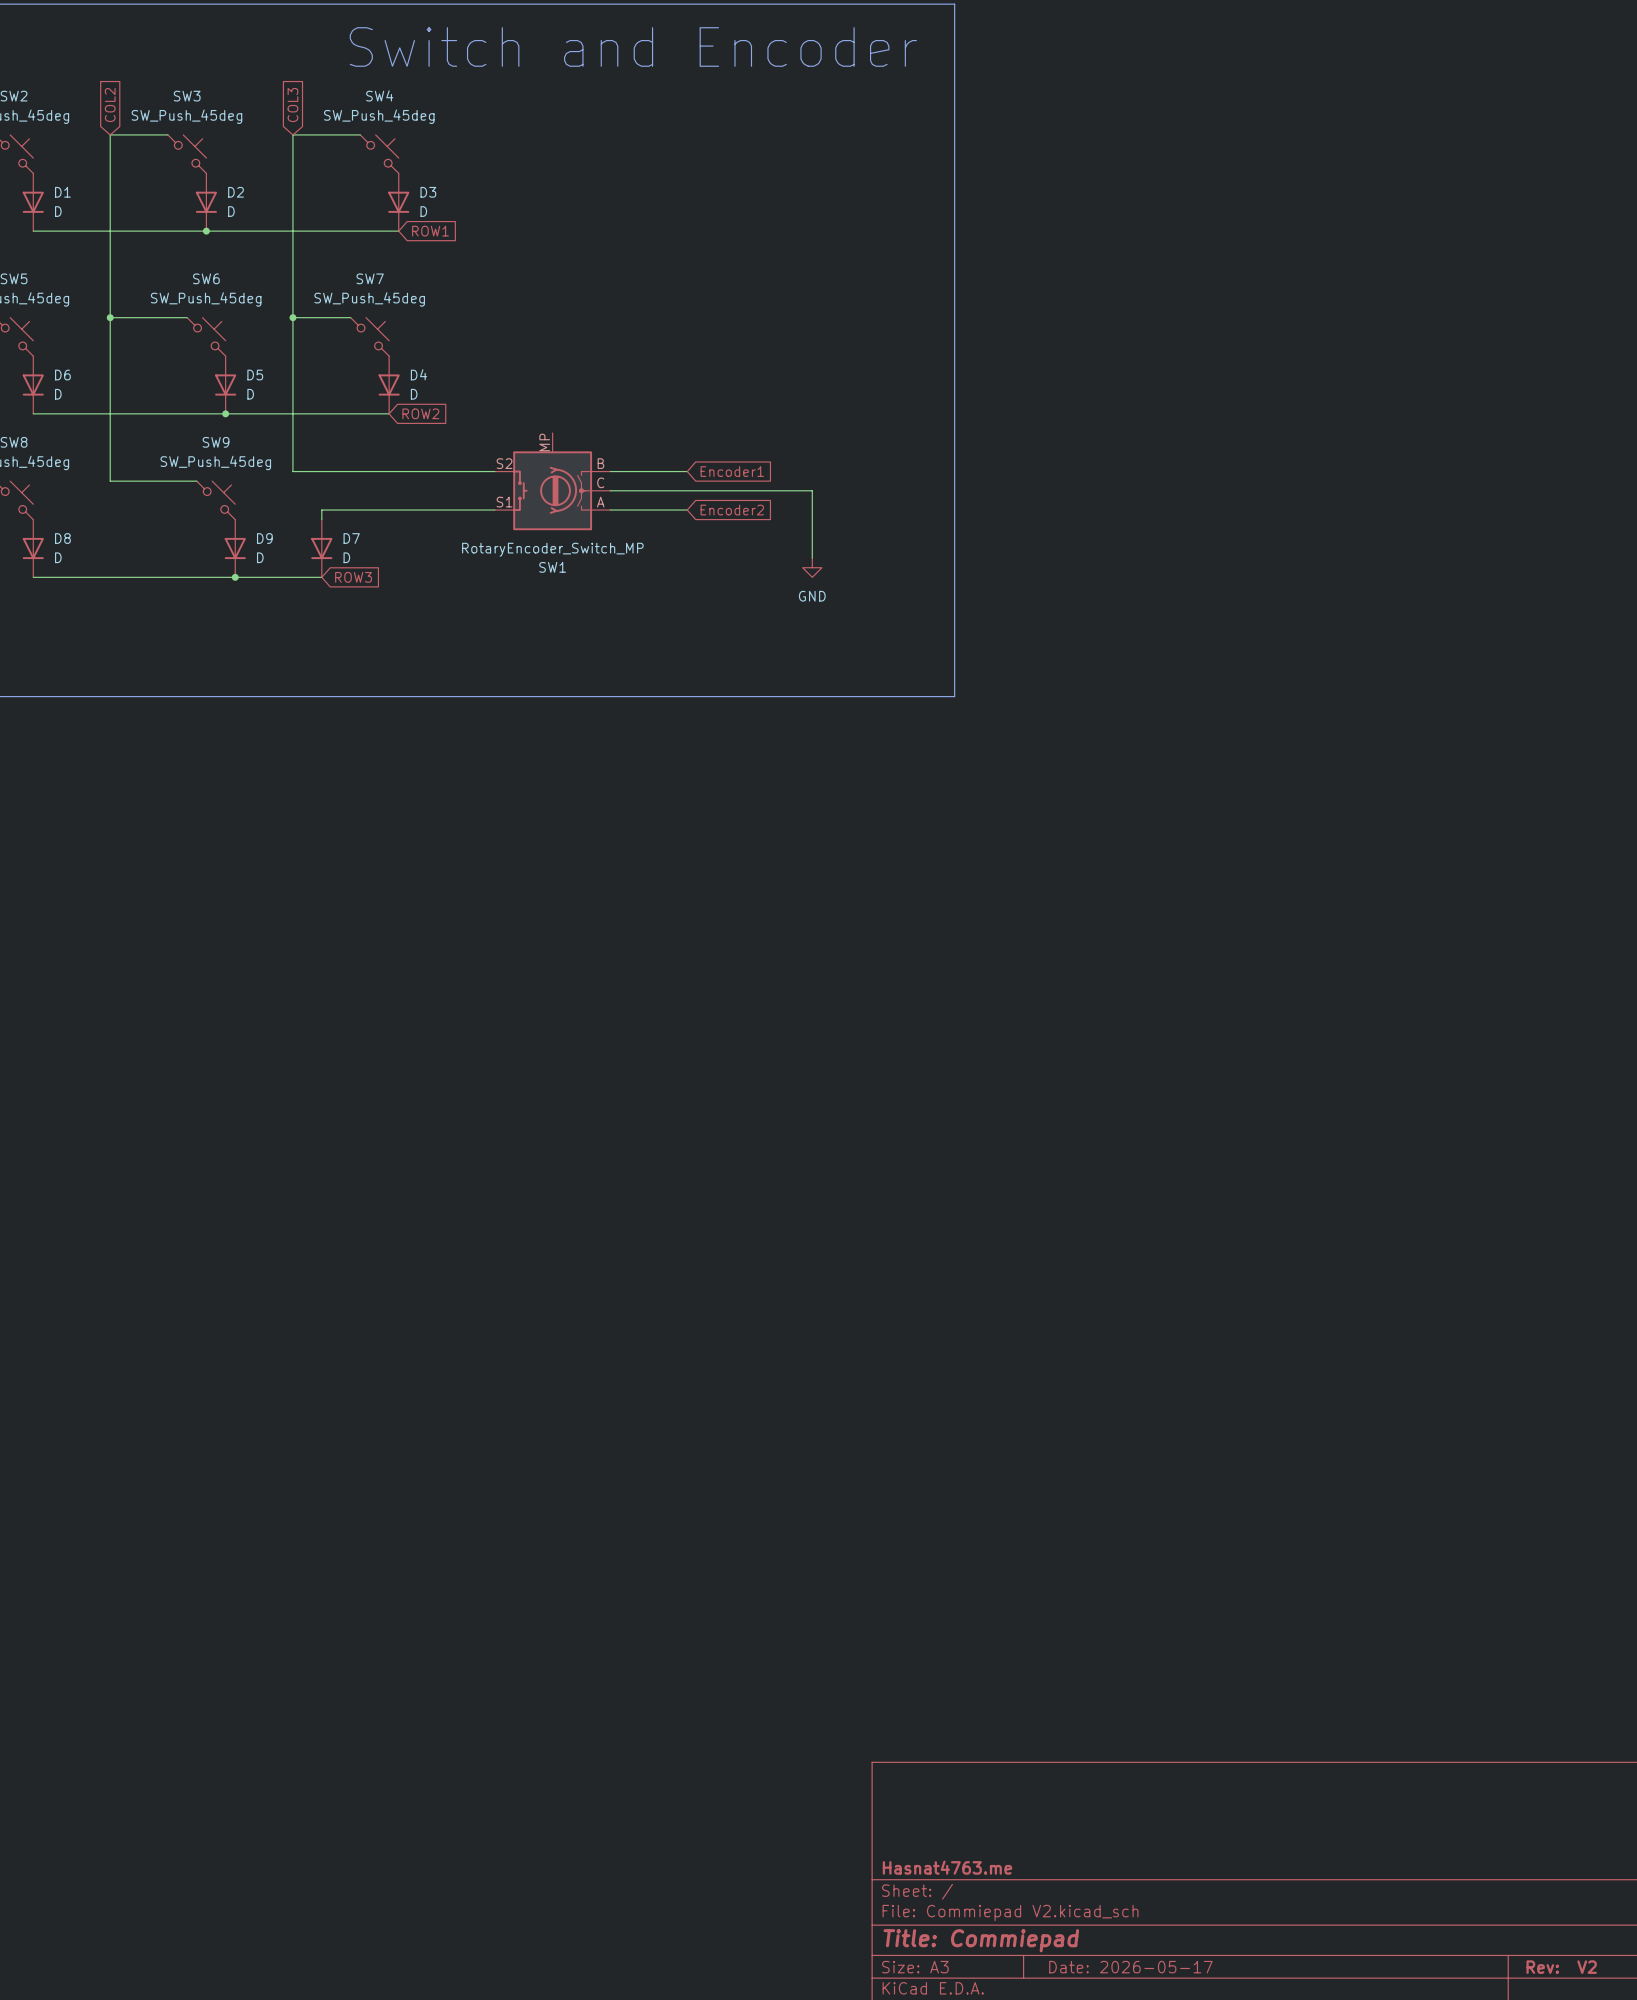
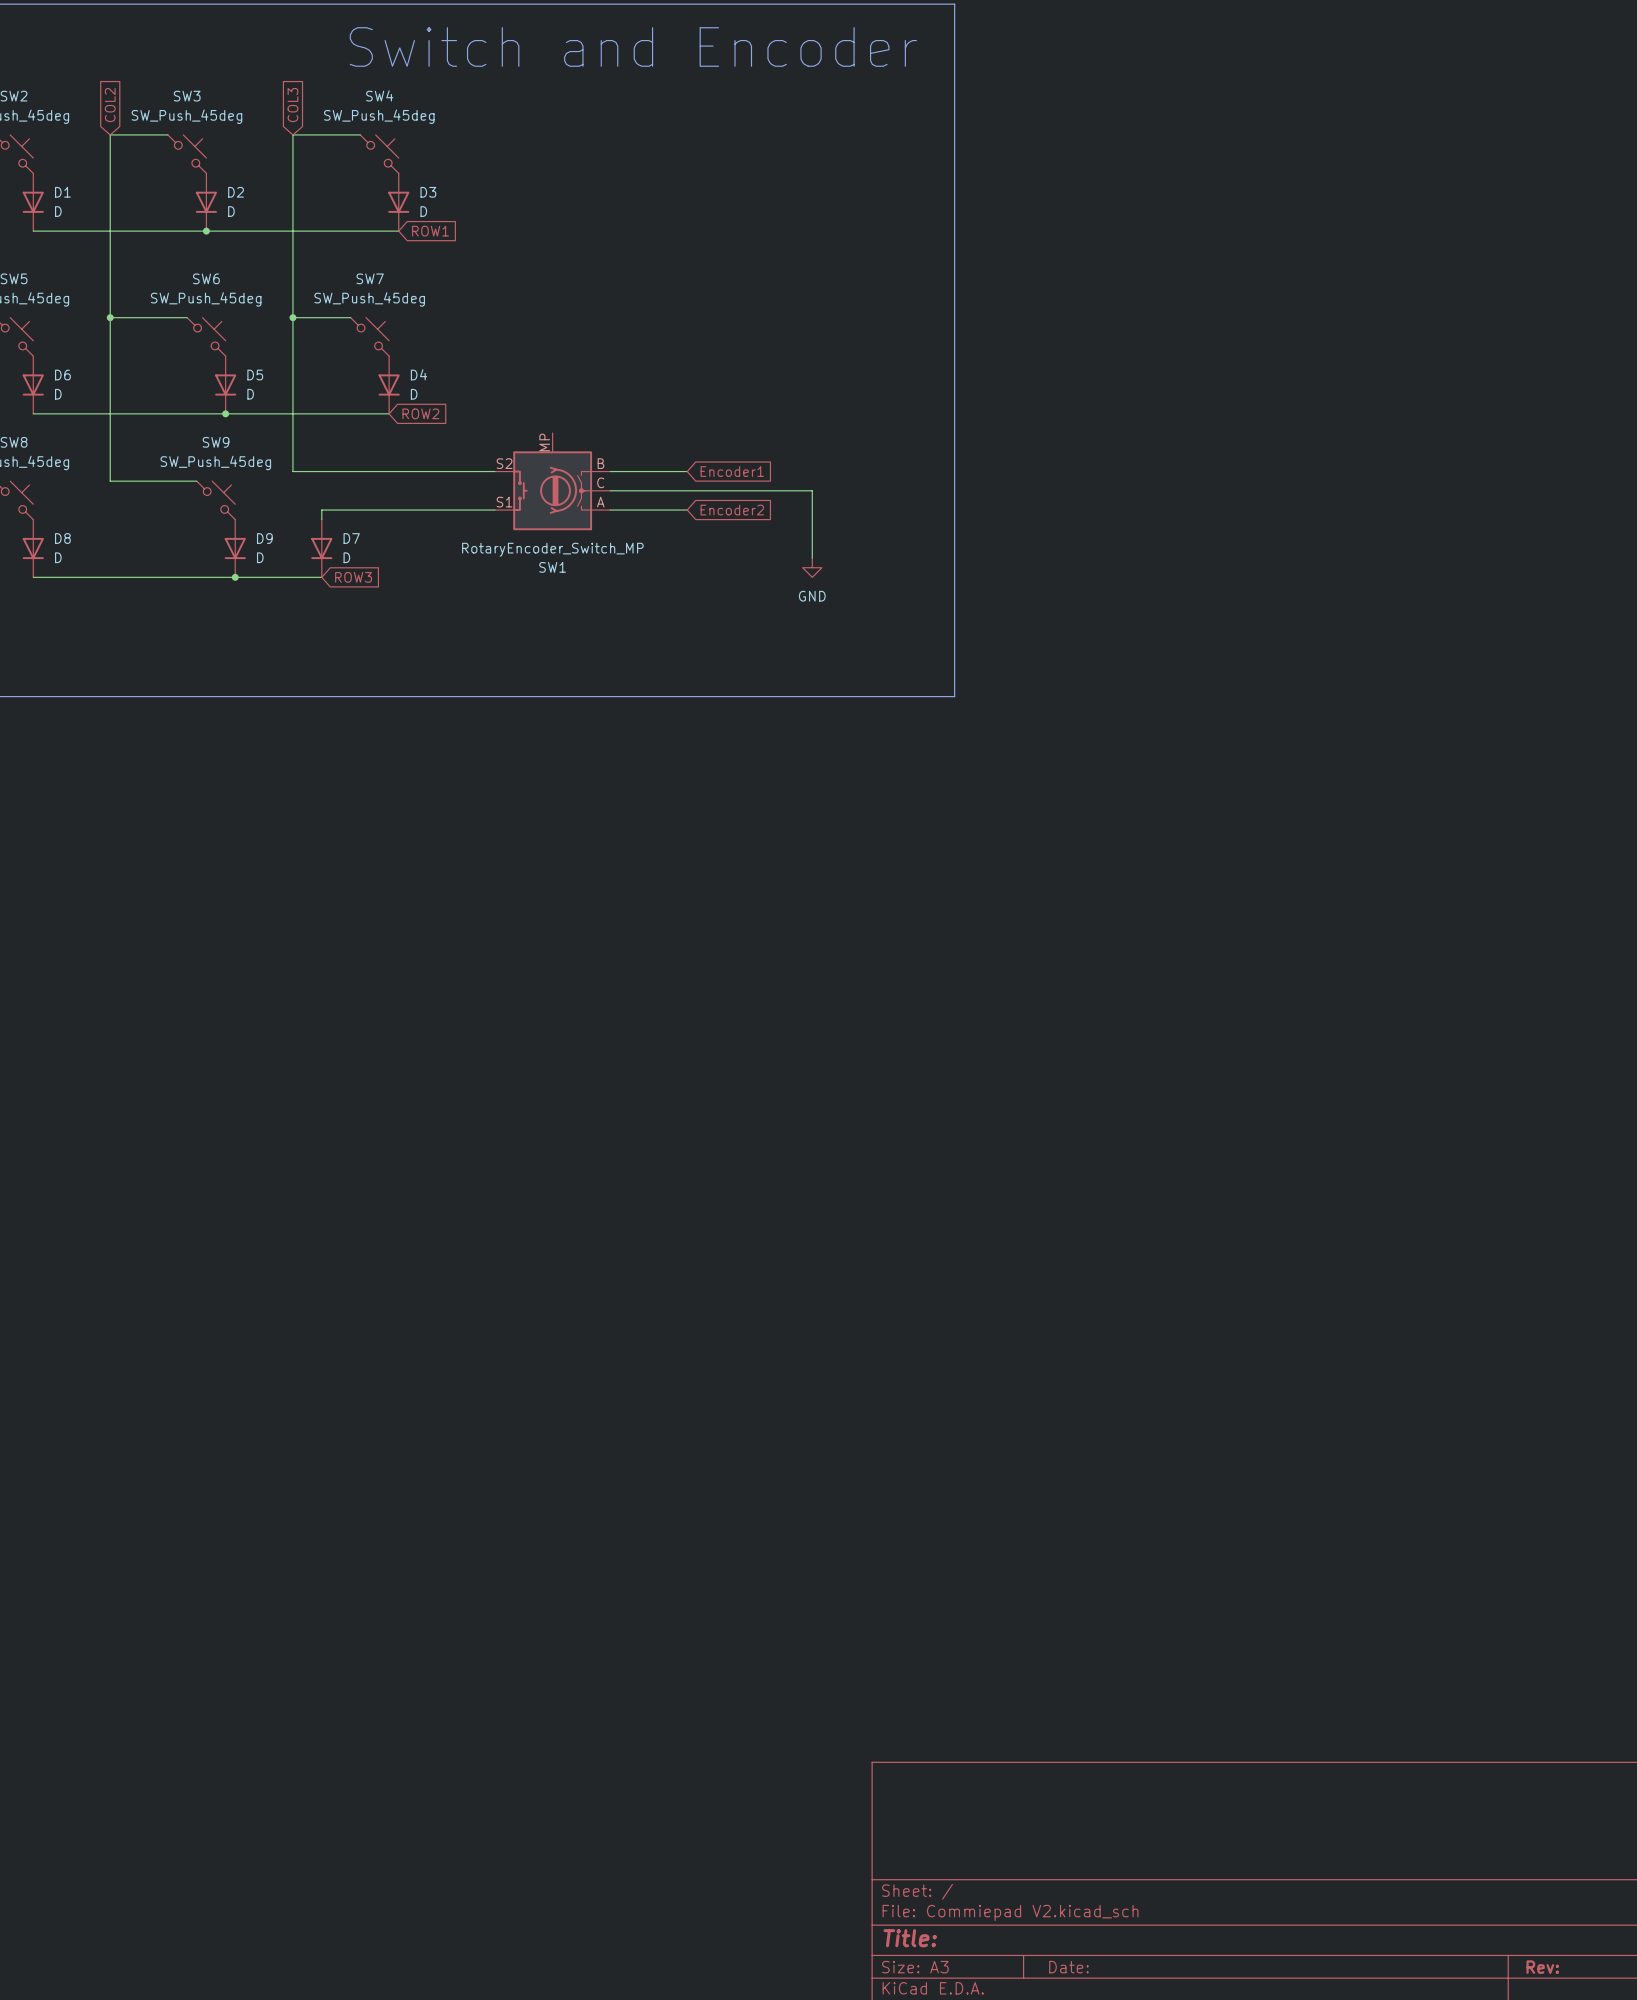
title block: Hasnat4763.me (947, 1867) -> none
title block: Title: Commiepad (981, 1940) -> Title: (910, 1938)
title block: Date: 2026-05-17 (1130, 1967) -> Date: (1068, 1967)
title block: Rev: V2 (1561, 1967) -> Rev: (1542, 1967)

